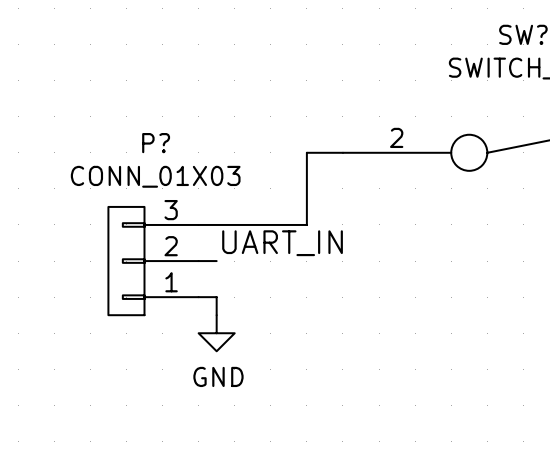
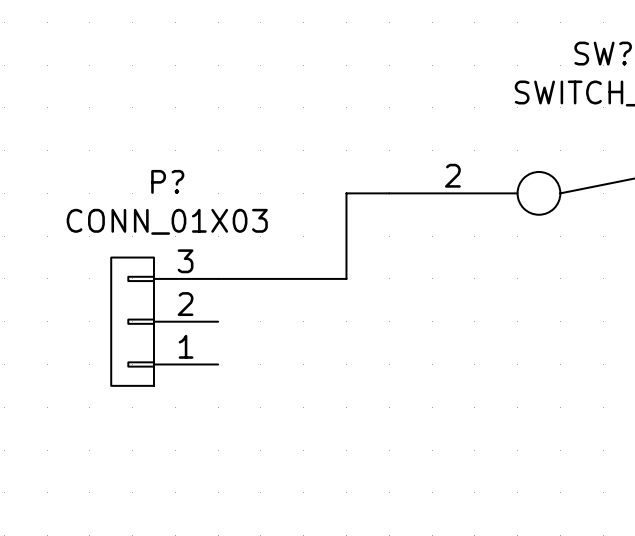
label: UART_IN (282, 243) -> none
wire: (198, 261) (216, 261) -> none
wire: (198, 297) (216, 297) (216, 315) -> none
power symbol: GND (216, 333) -> none

